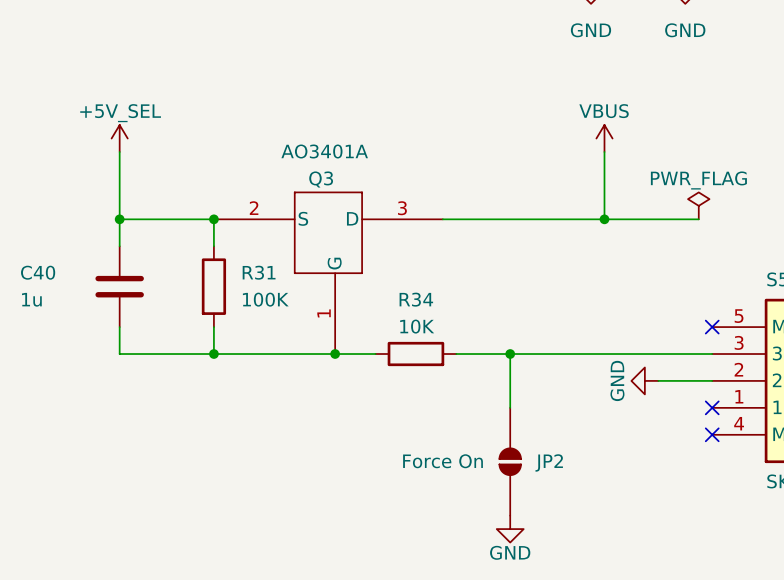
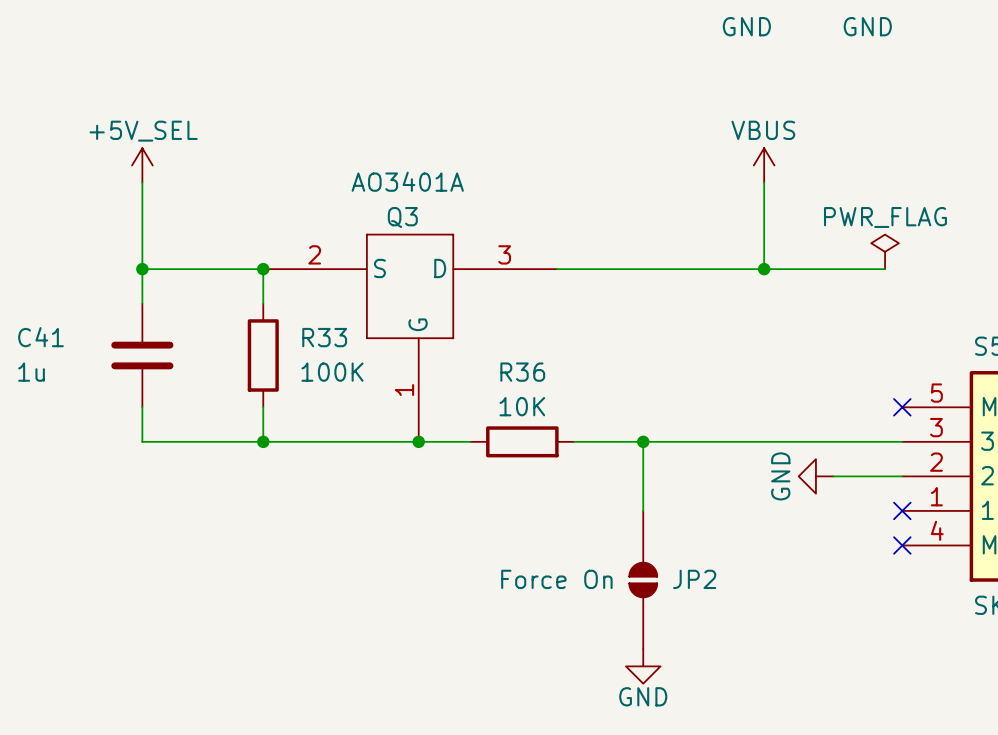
C40 name: C40 (38, 272) -> C41 (40, 337)
R31 name: R31 (259, 272) -> R33 (324, 337)
R34 name: R34 (416, 299) -> R36 (522, 372)

